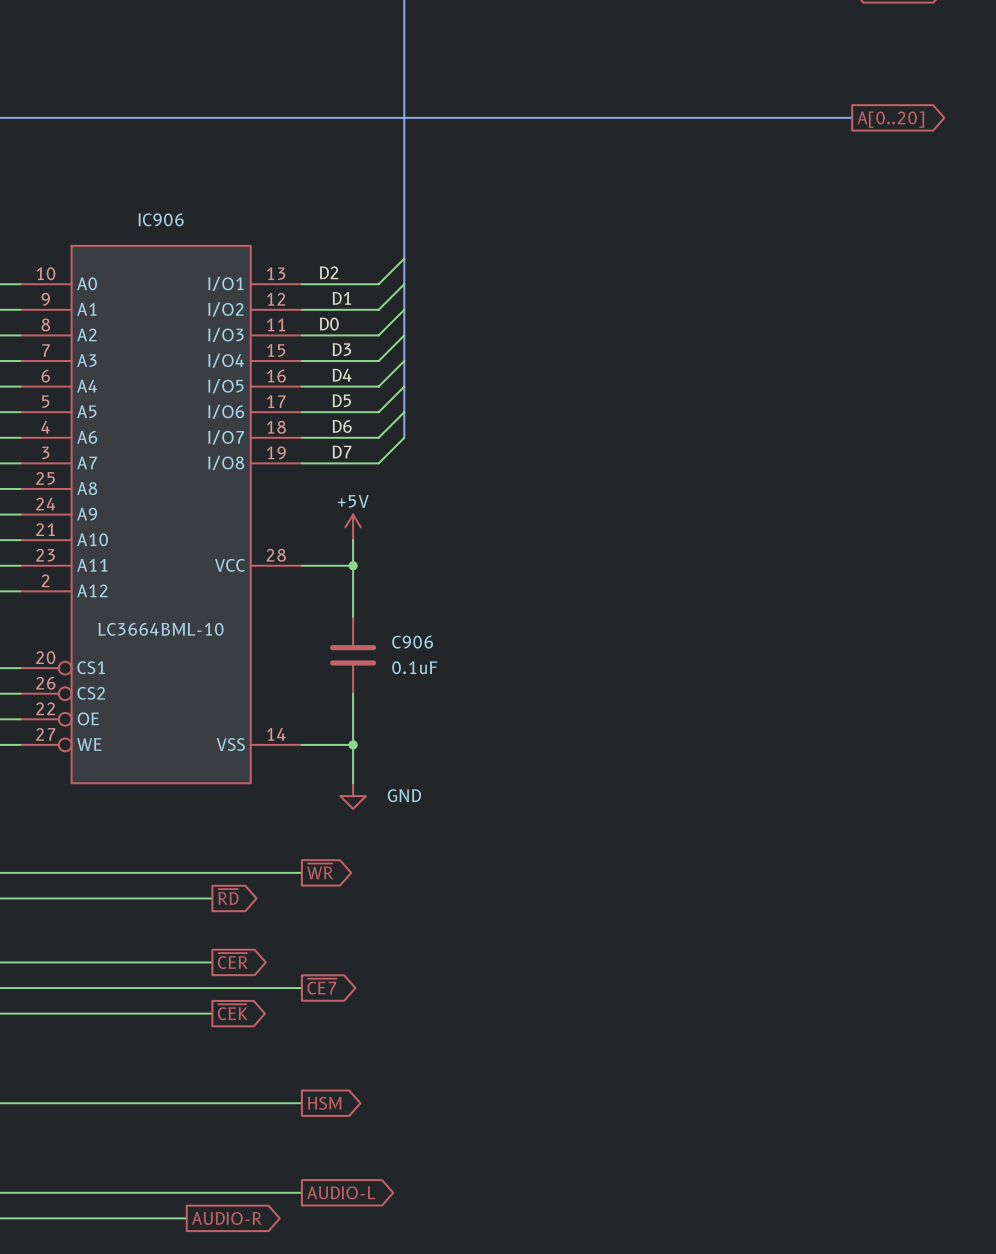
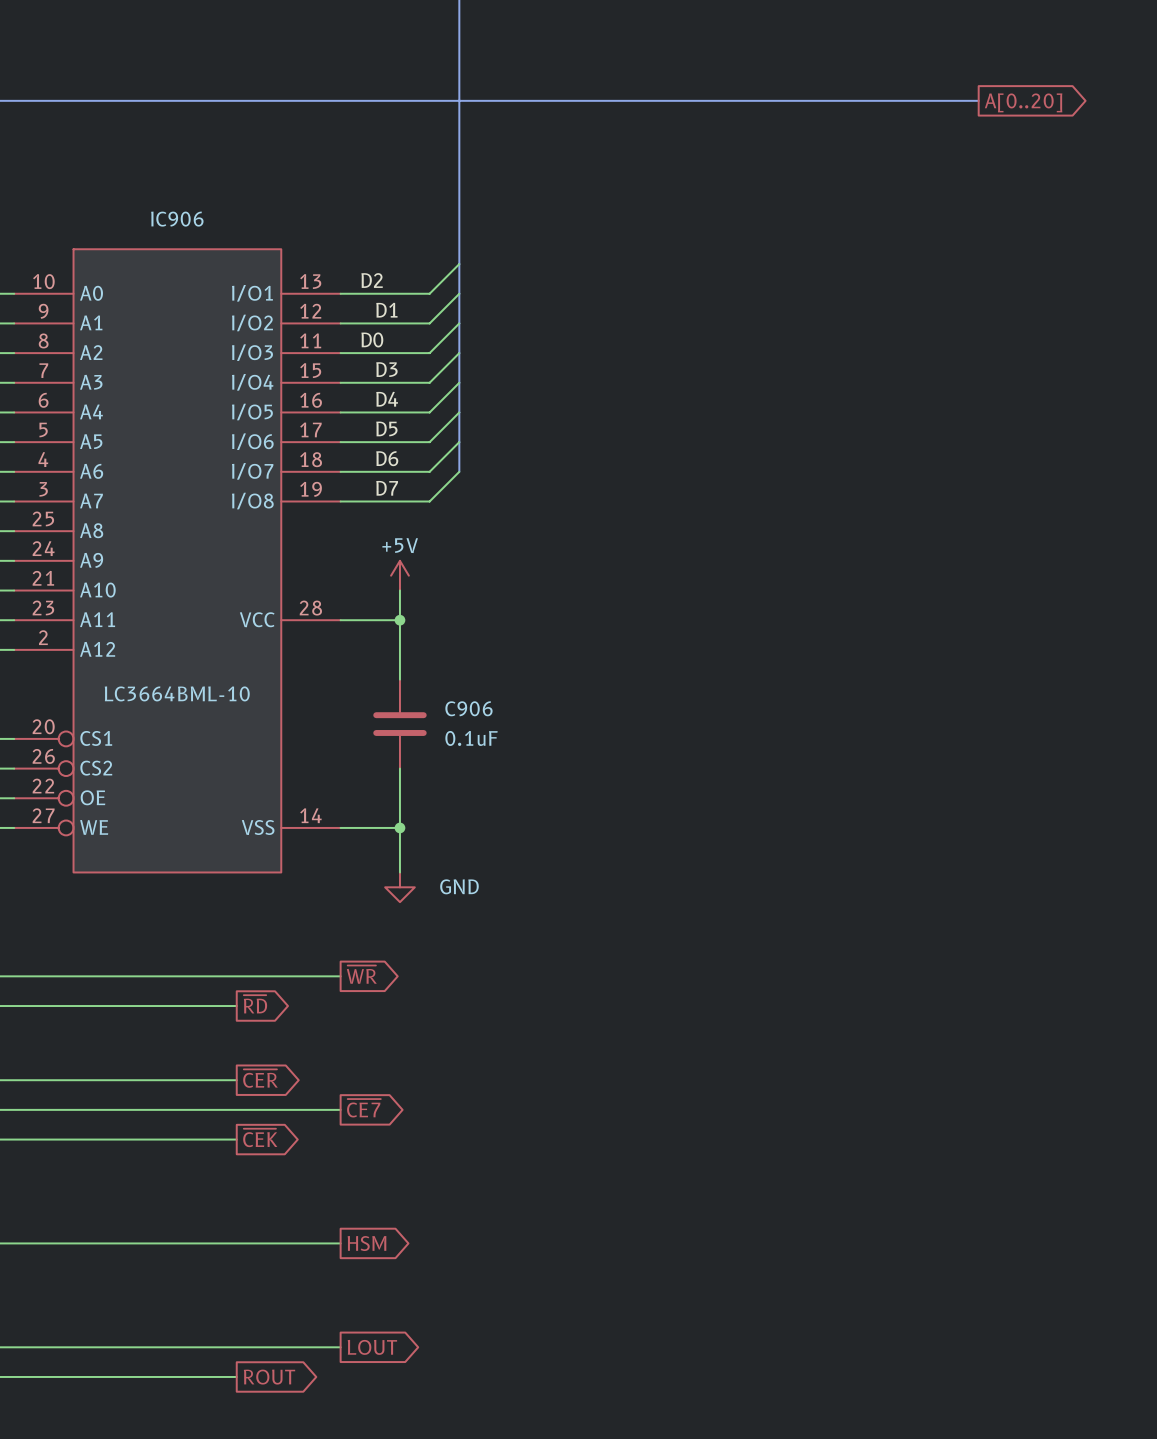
global label: AUDIO-L (341, 1192) -> LOUT (372, 1347)
wire: none -> (207, 1376) (236, 1376)
global label: AUDIO-R (226, 1218) -> none
global label: none -> ROUT (269, 1377)

